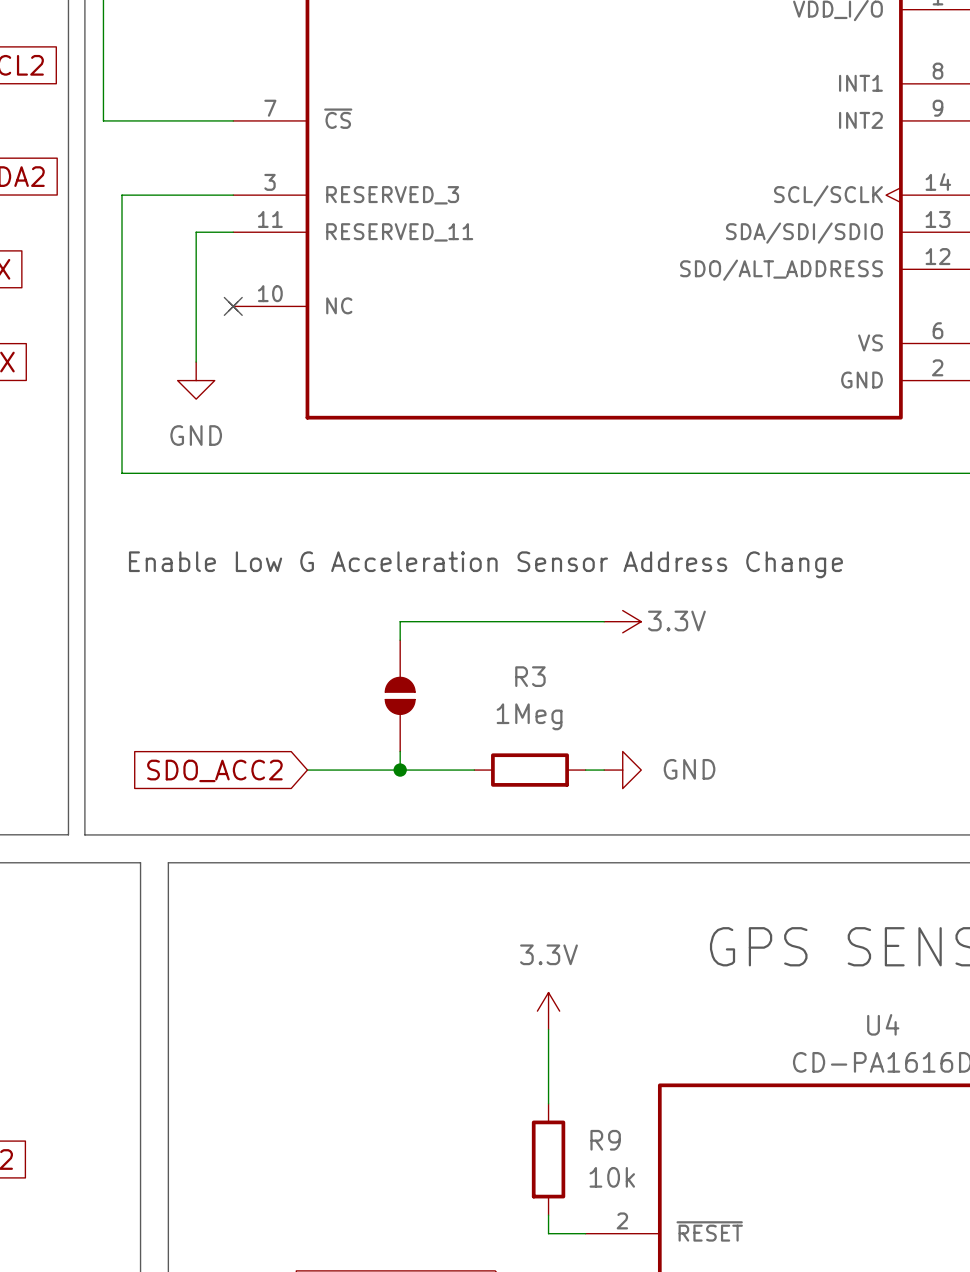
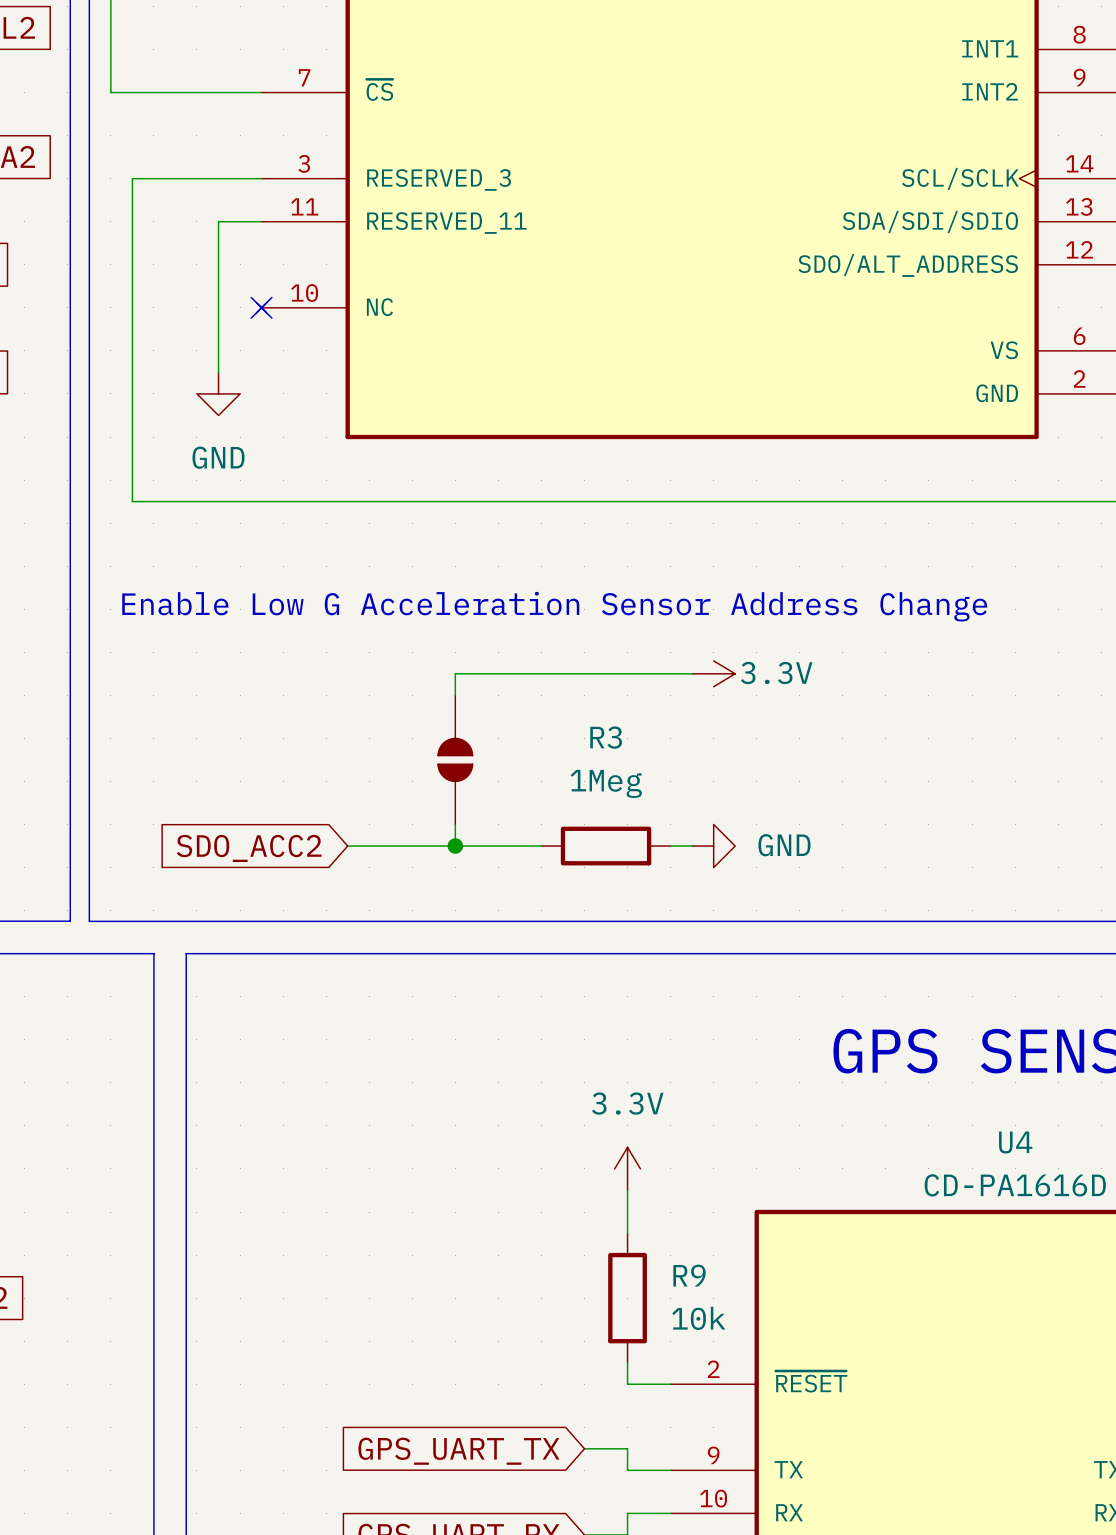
power symbol position: 3.3V (548, 1011) -> 3.3V (627, 1168)

